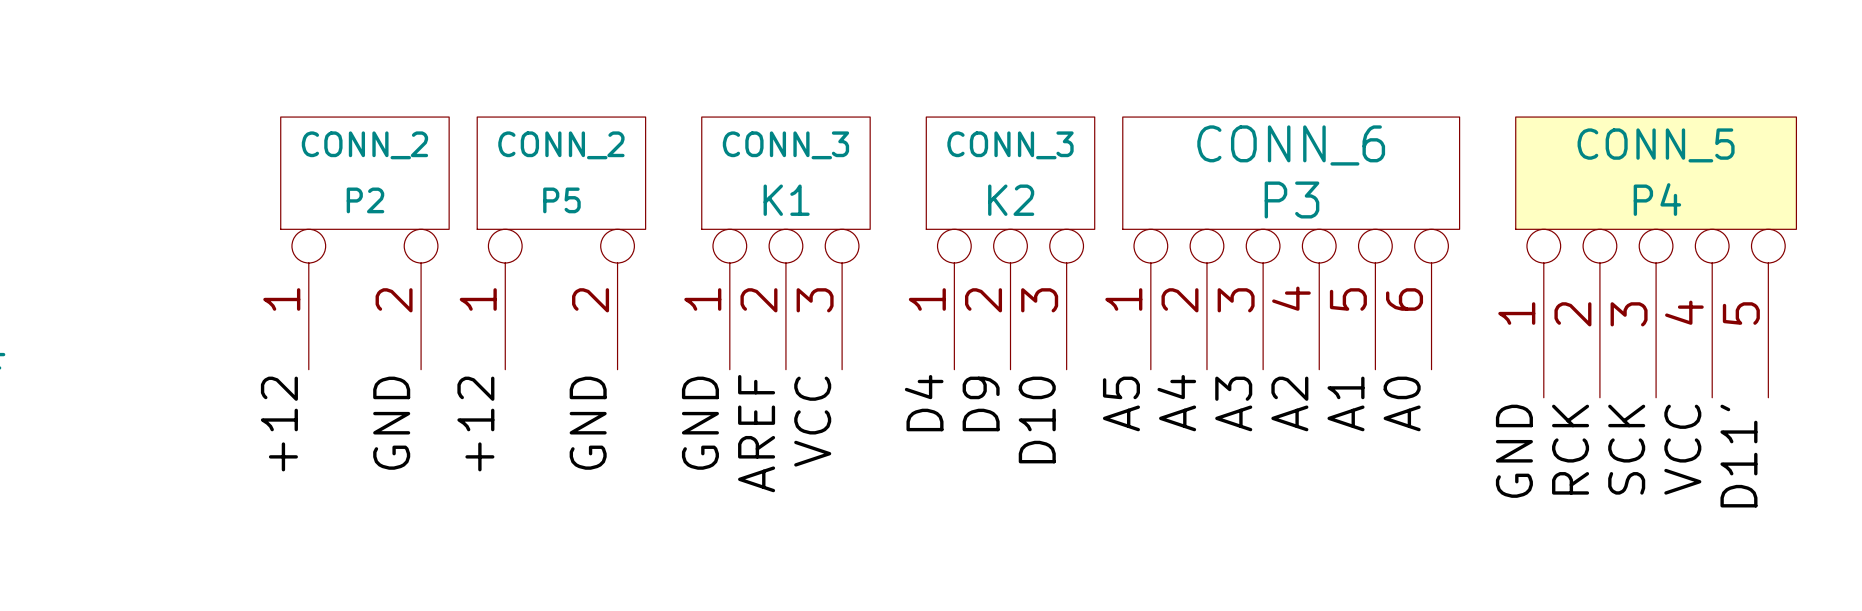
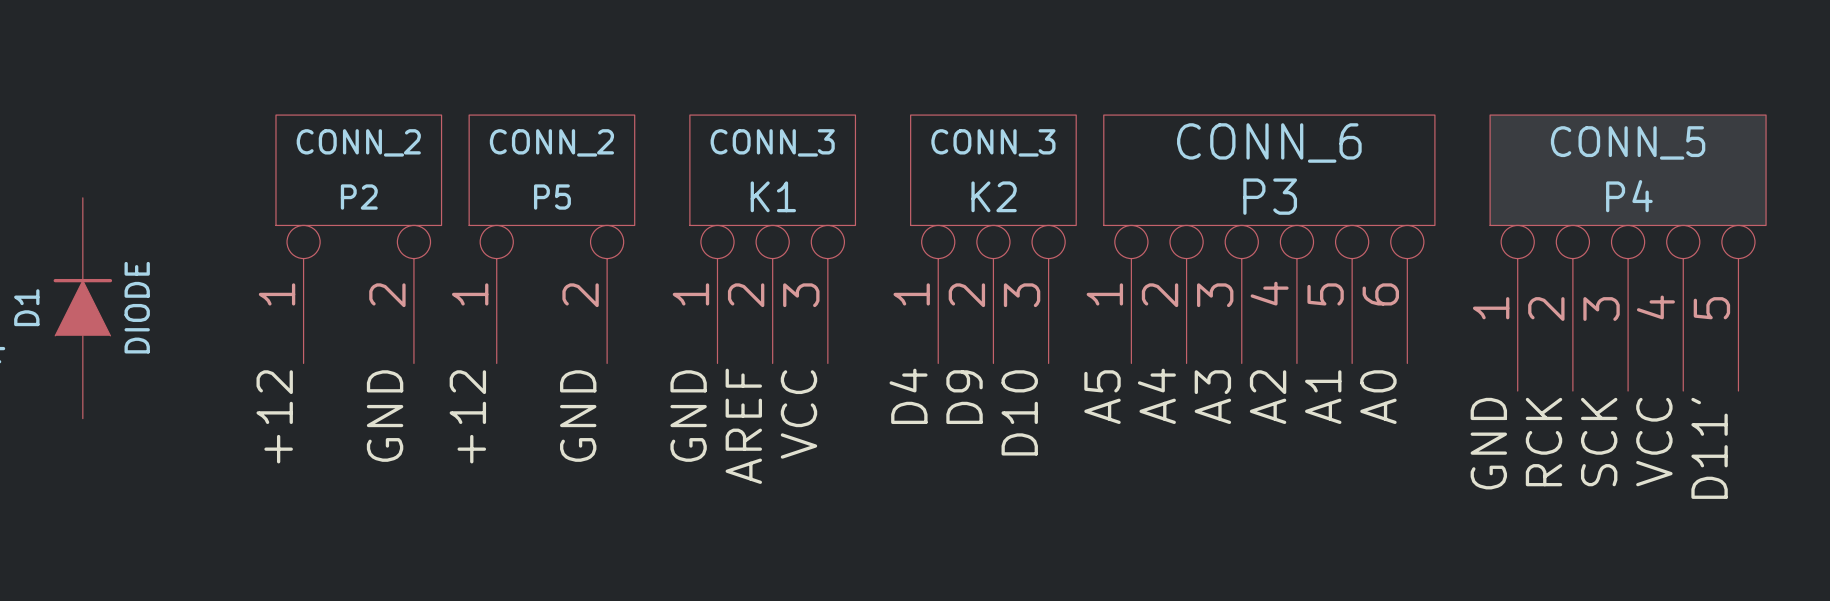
D1: none -> DIODE (82, 308)

